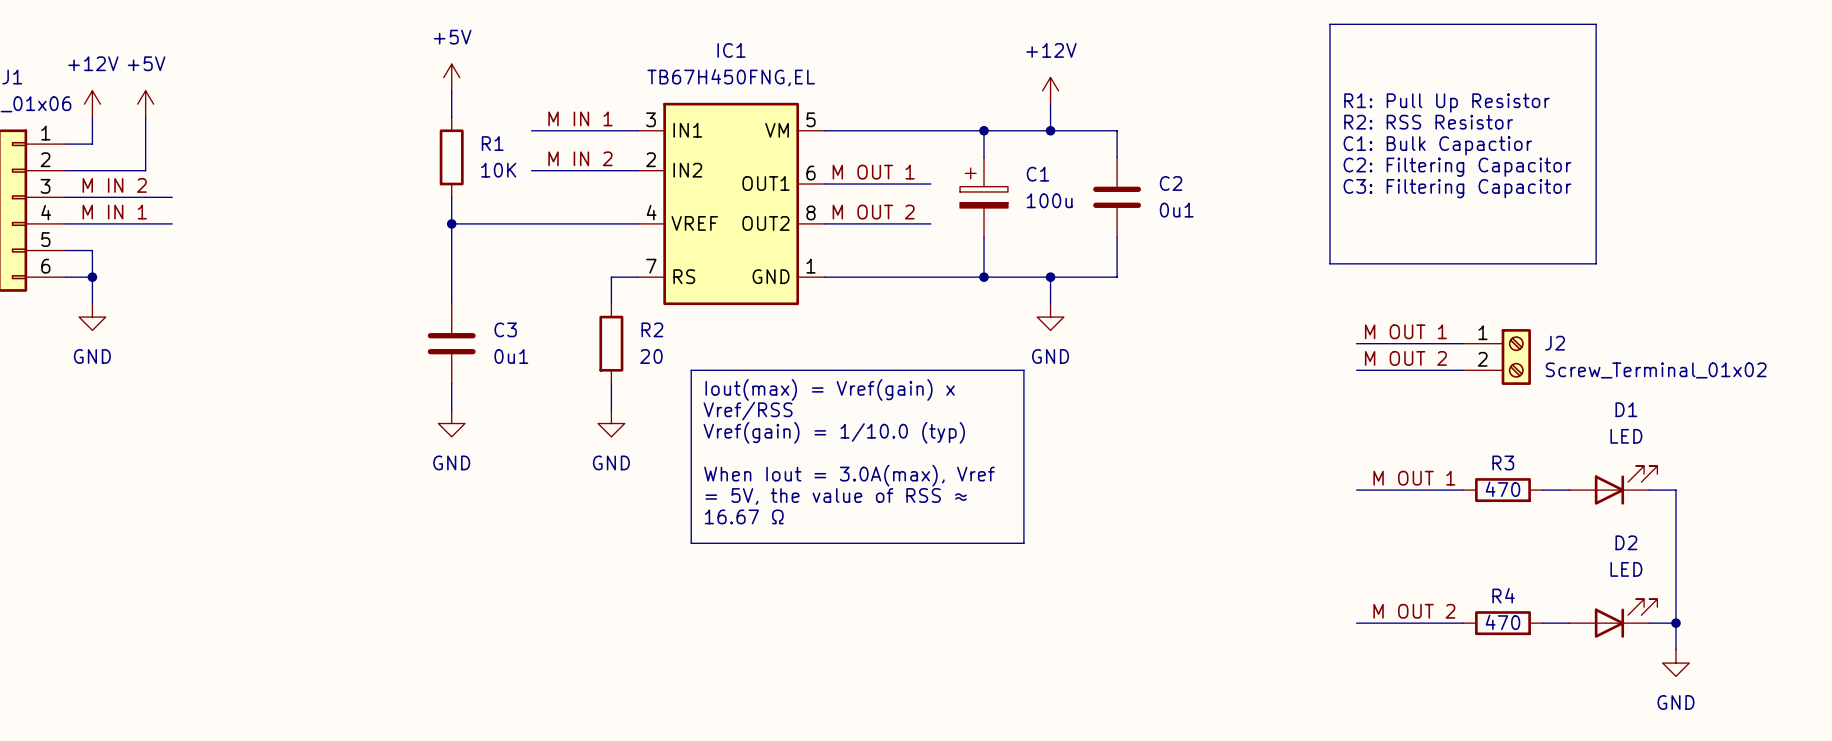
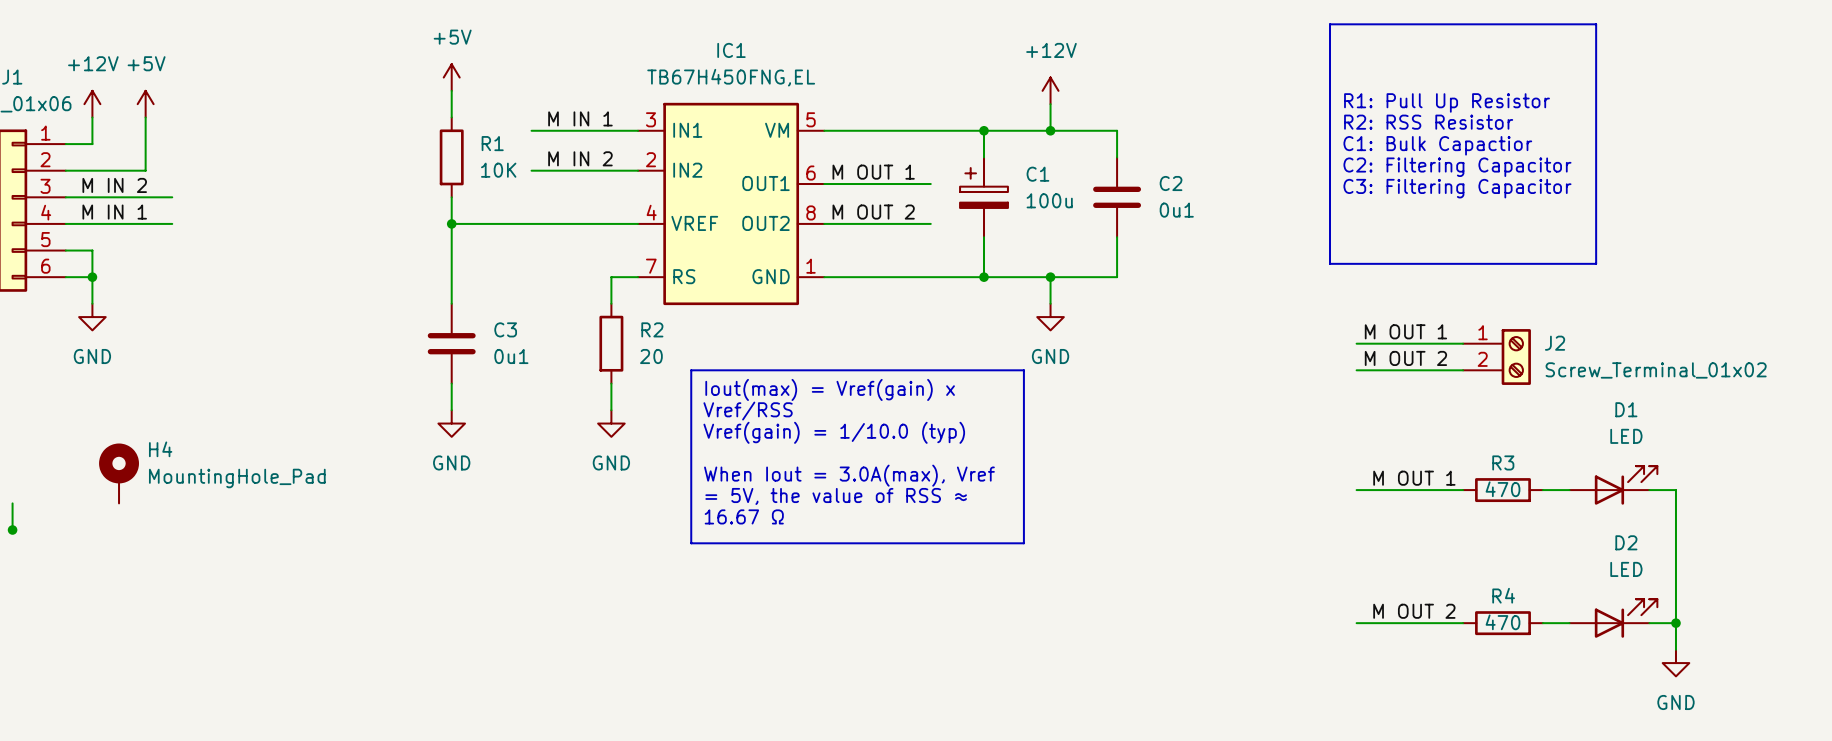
H4: none -> MountingHole_Pad (119, 473)
wire: none -> (12, 503) (12, 529)
junction: none -> (12, 529)

